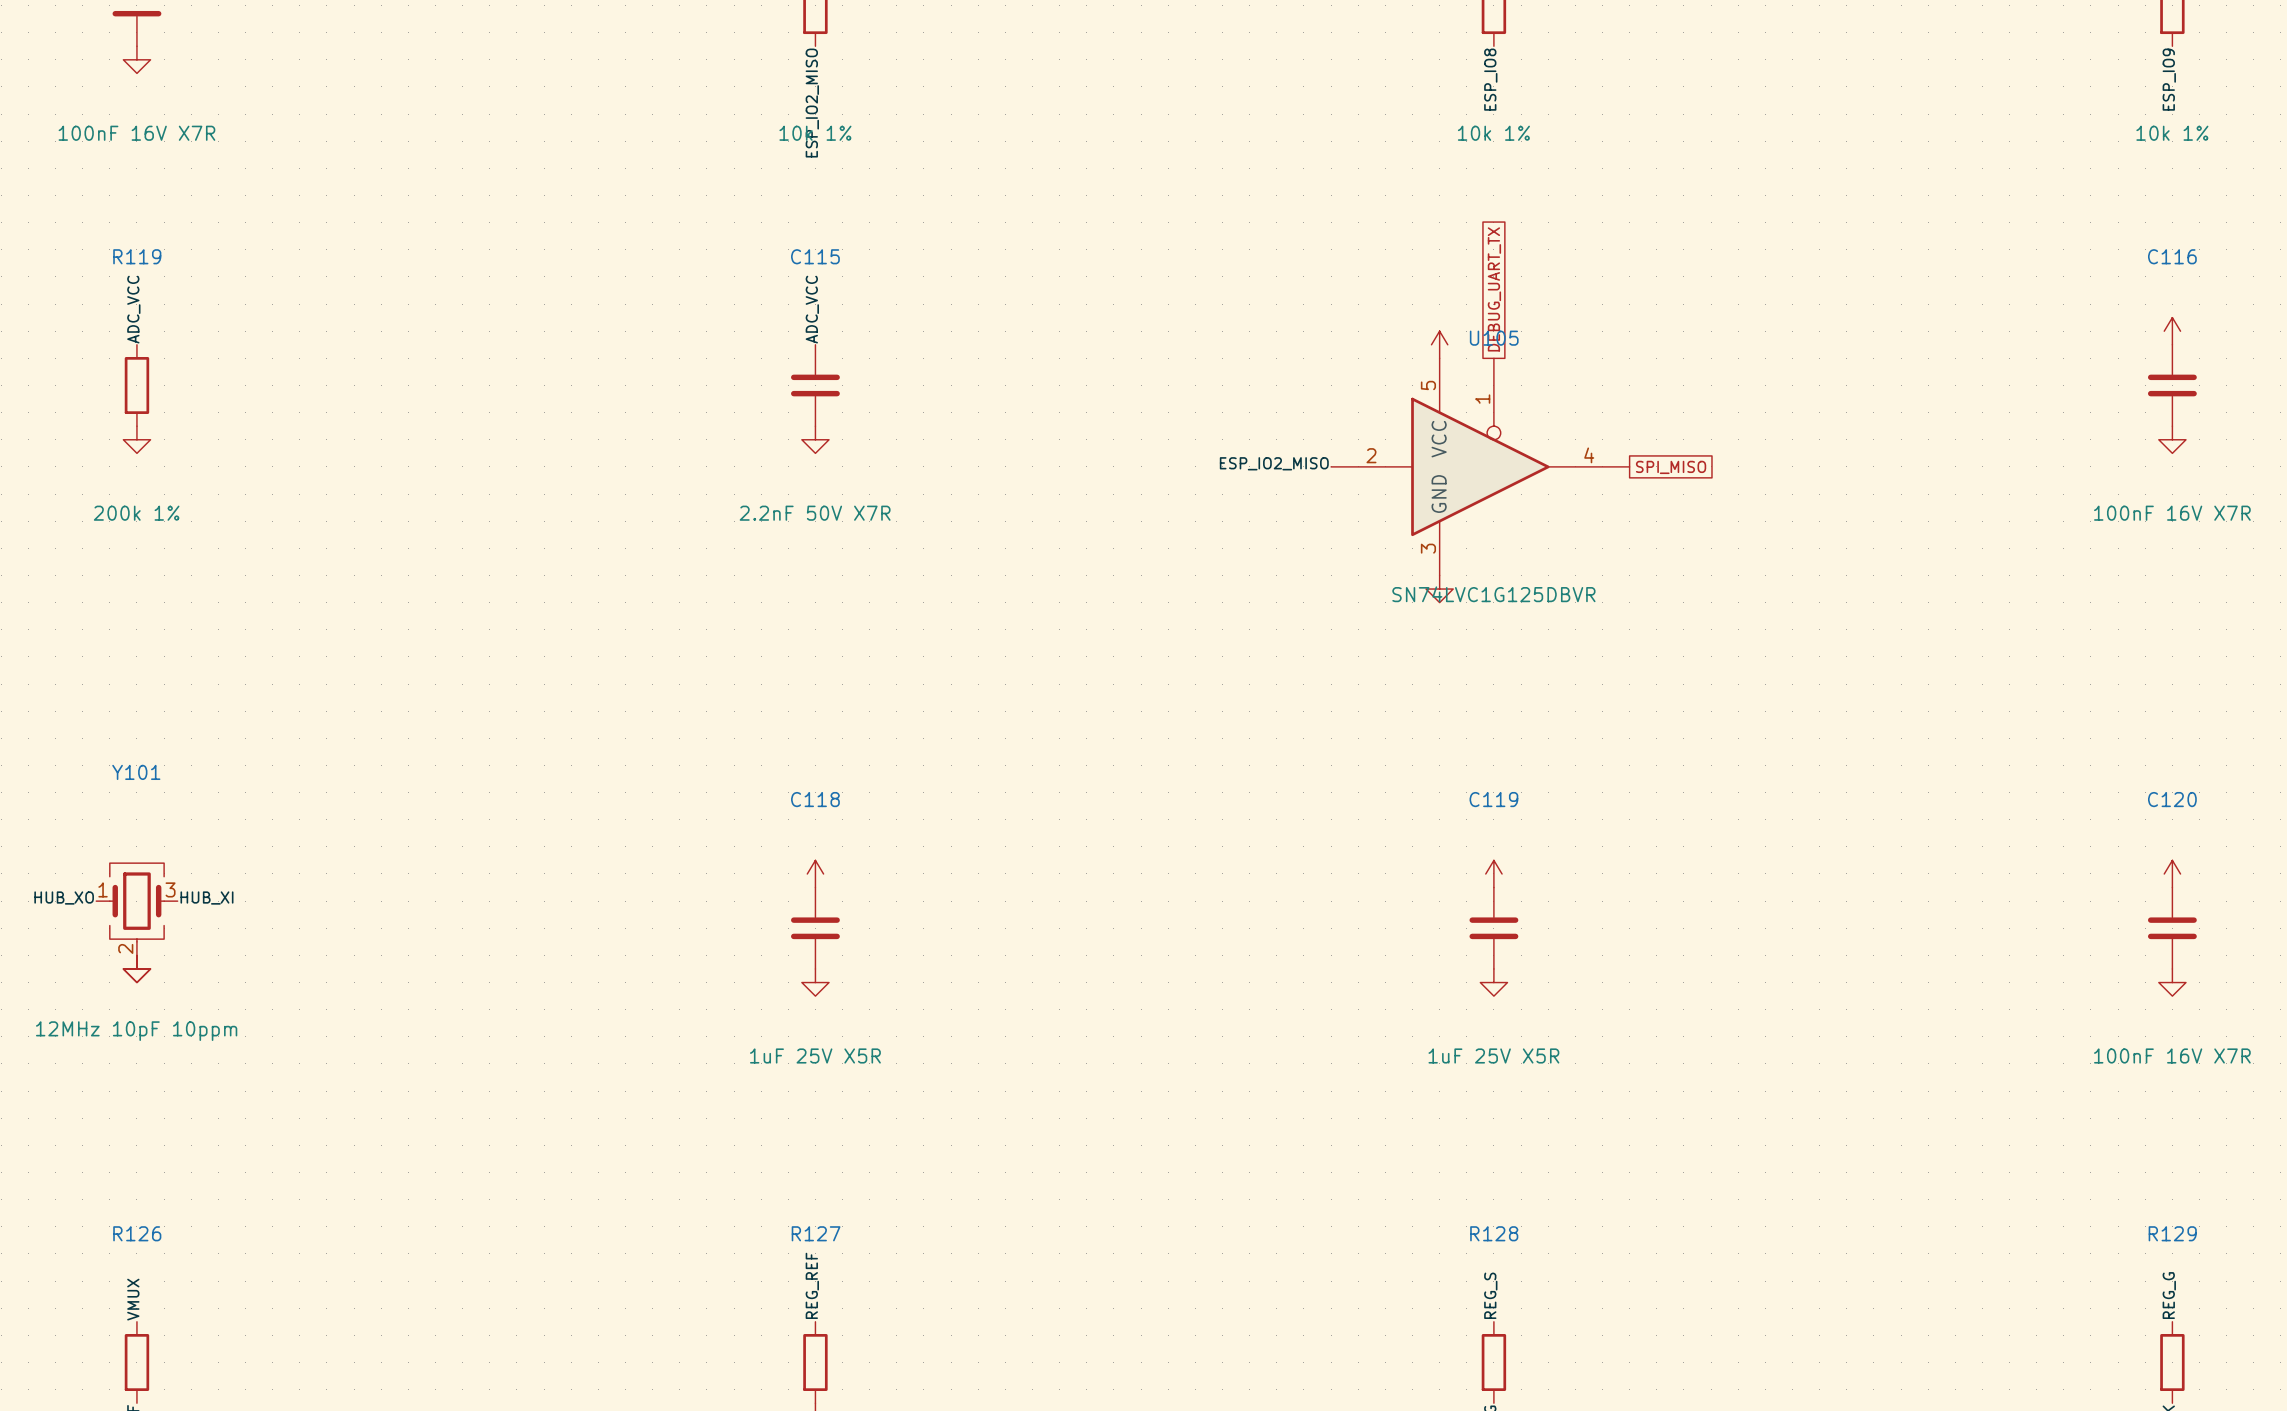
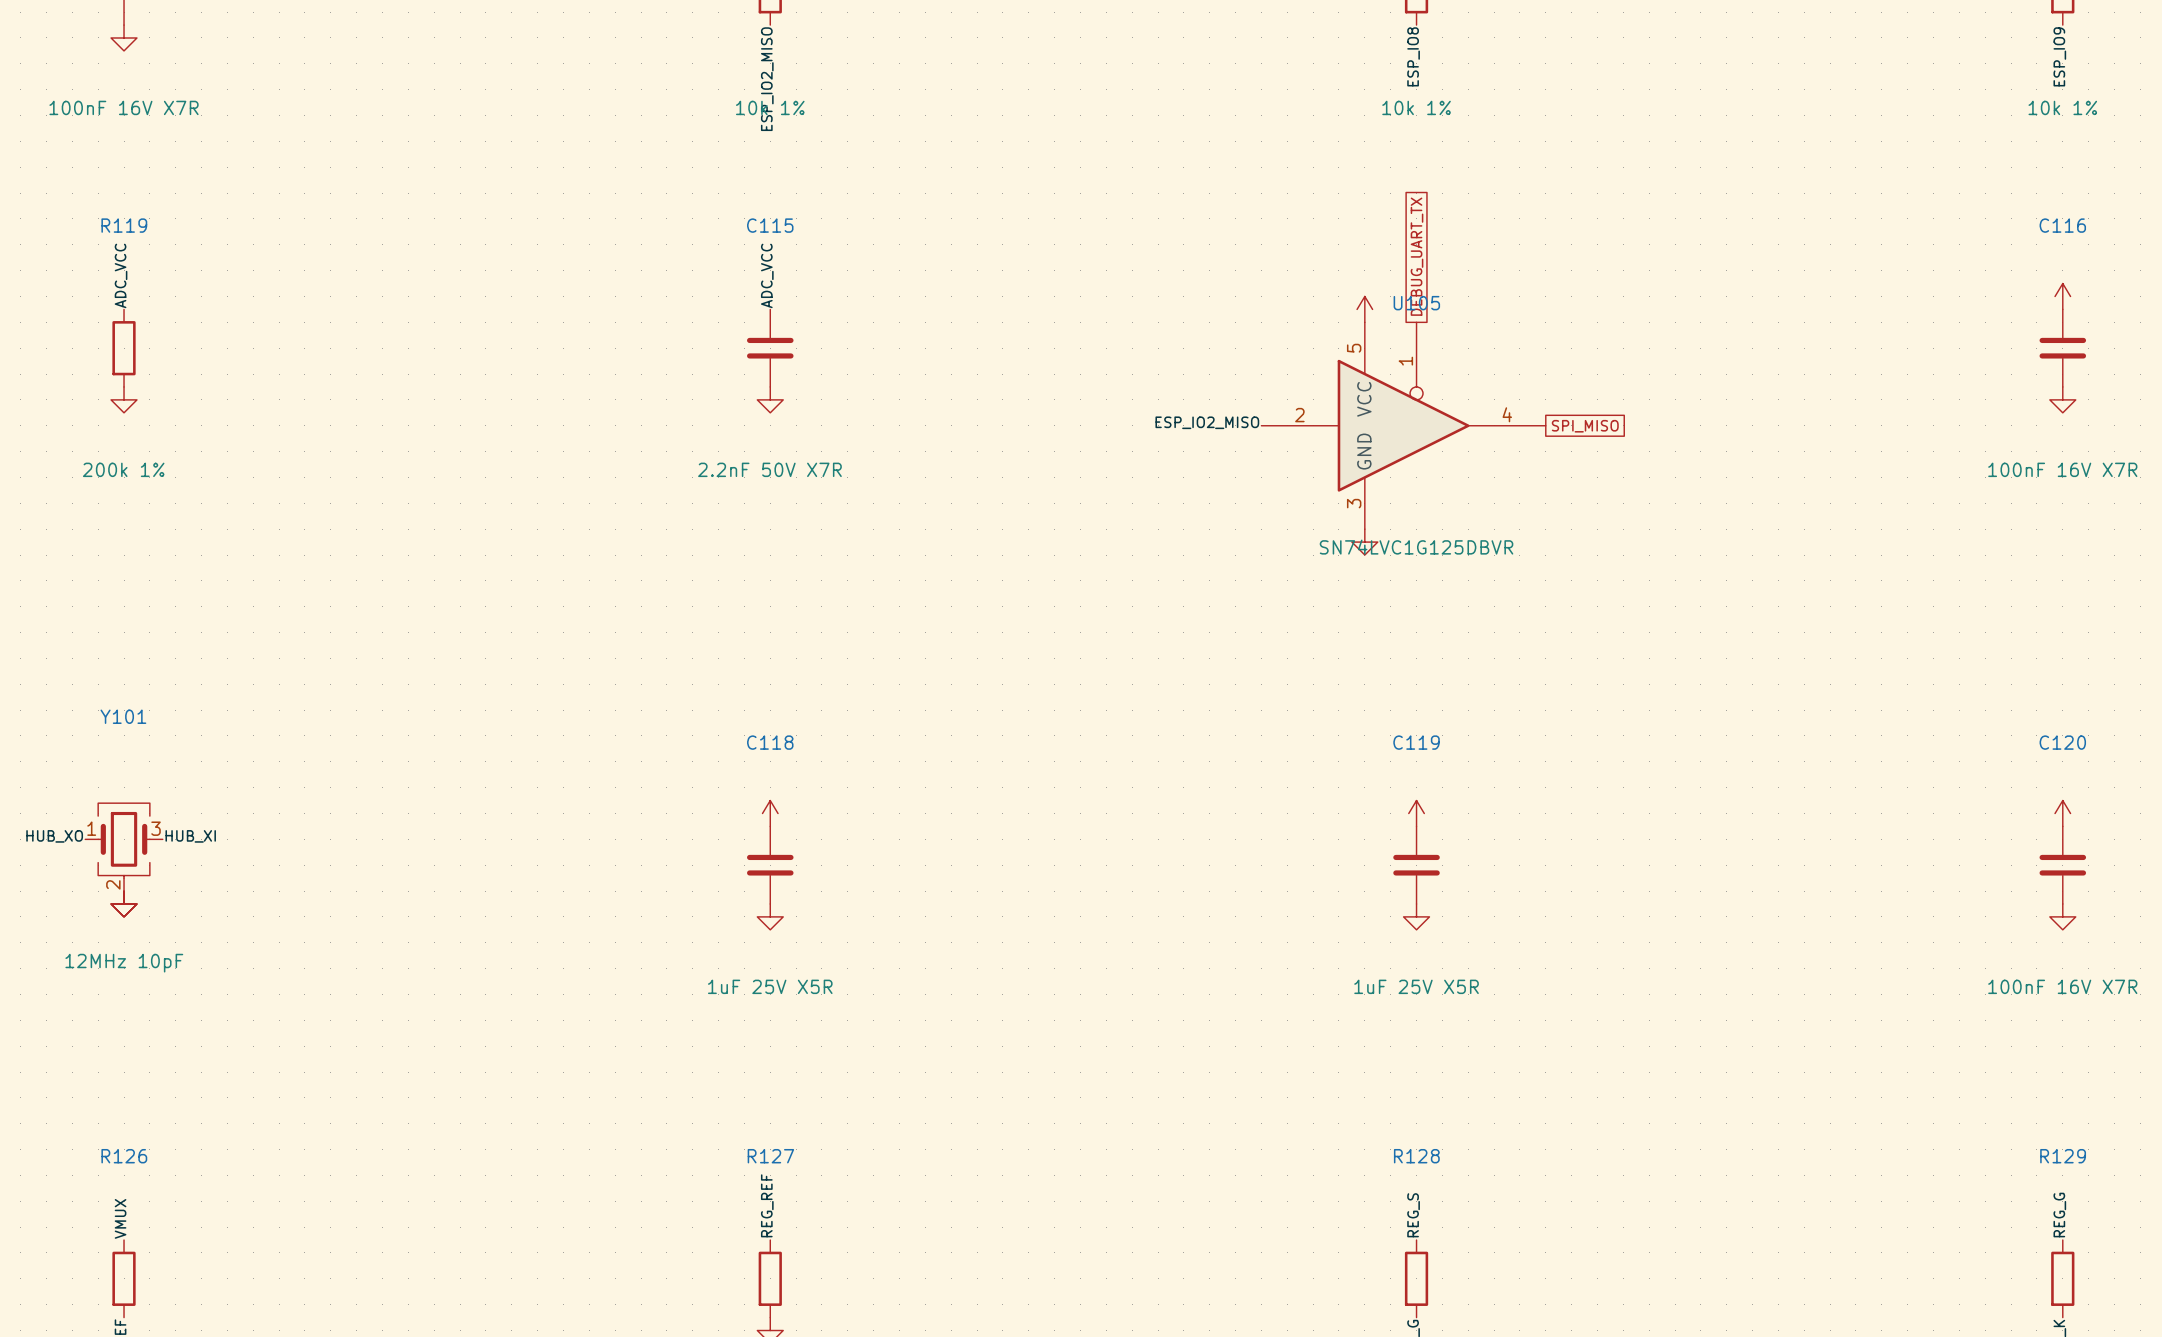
Y101 value: 12MHz 10pF 10ppm (136, 1031) -> 12MHz 10pF (124, 963)

